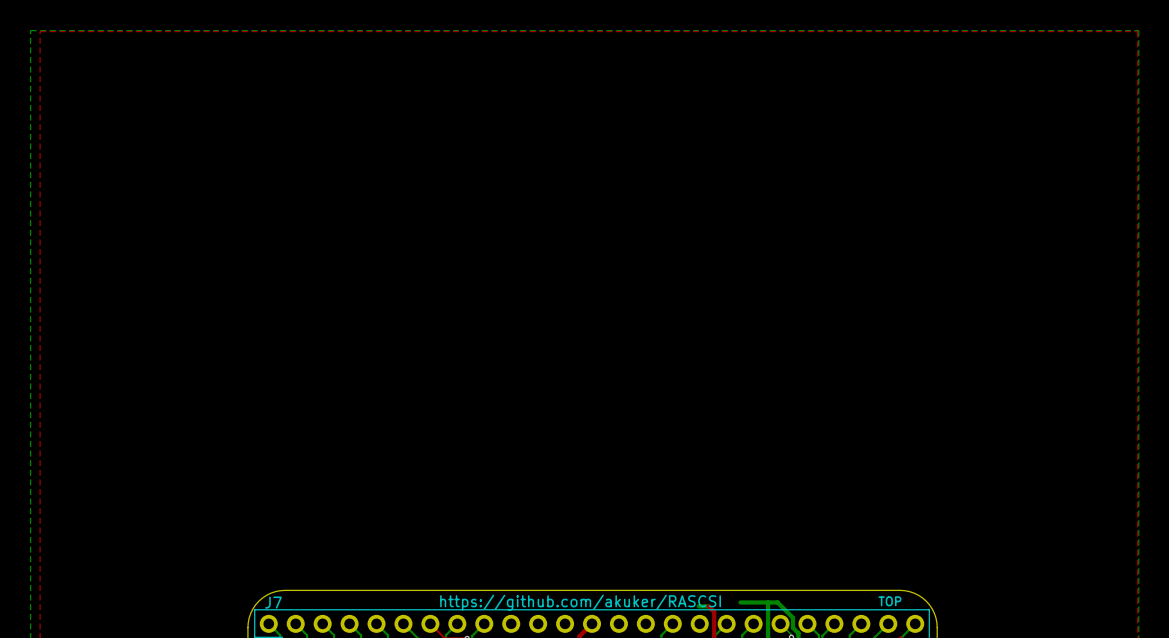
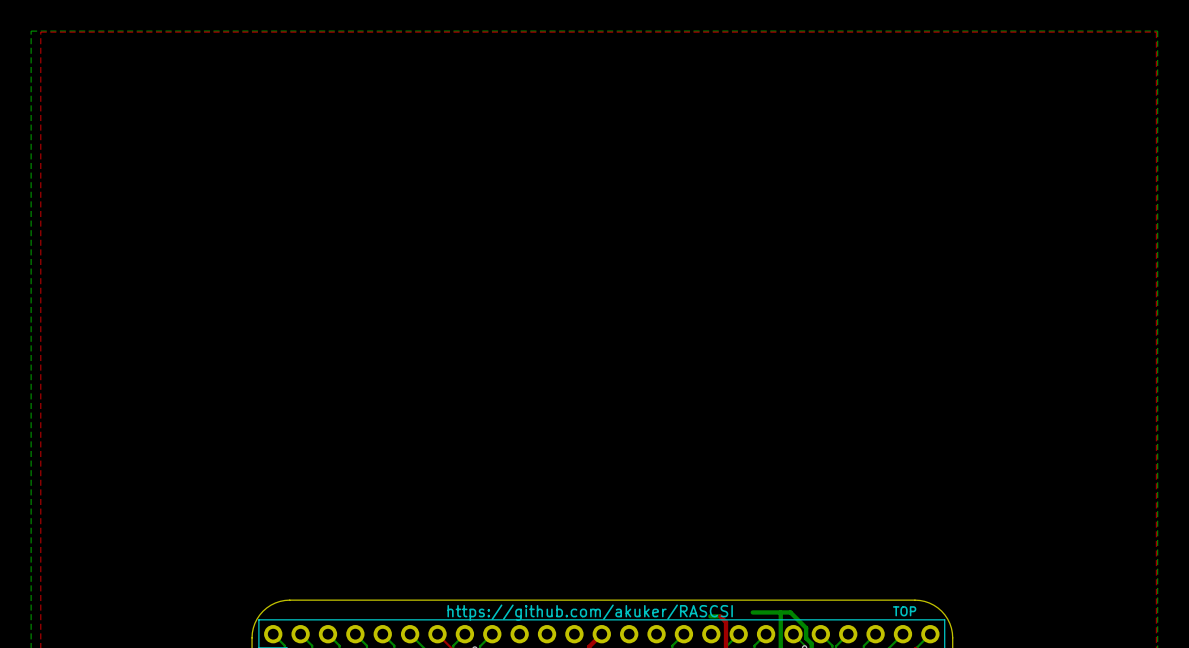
J7 name: J7 (273, 602) -> none

